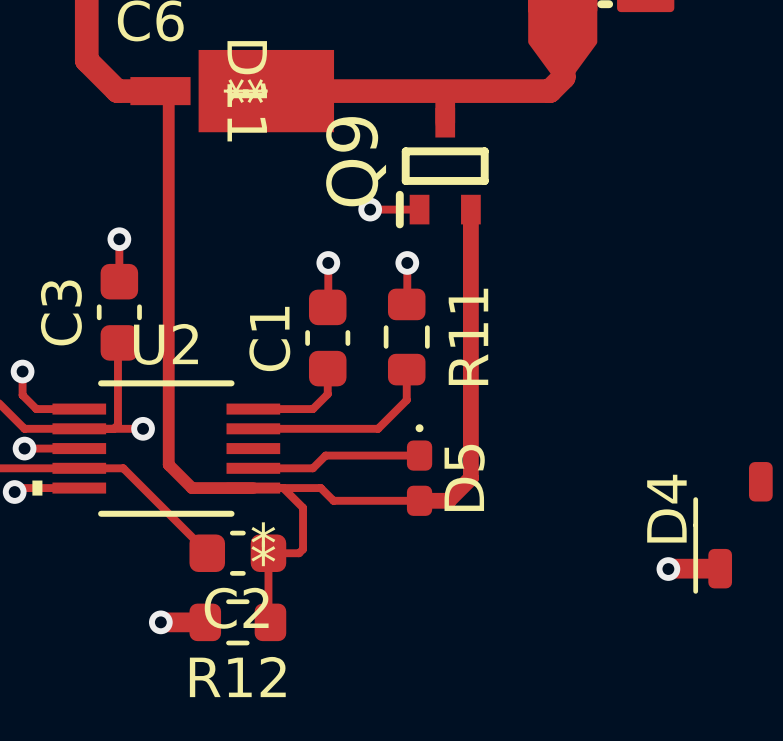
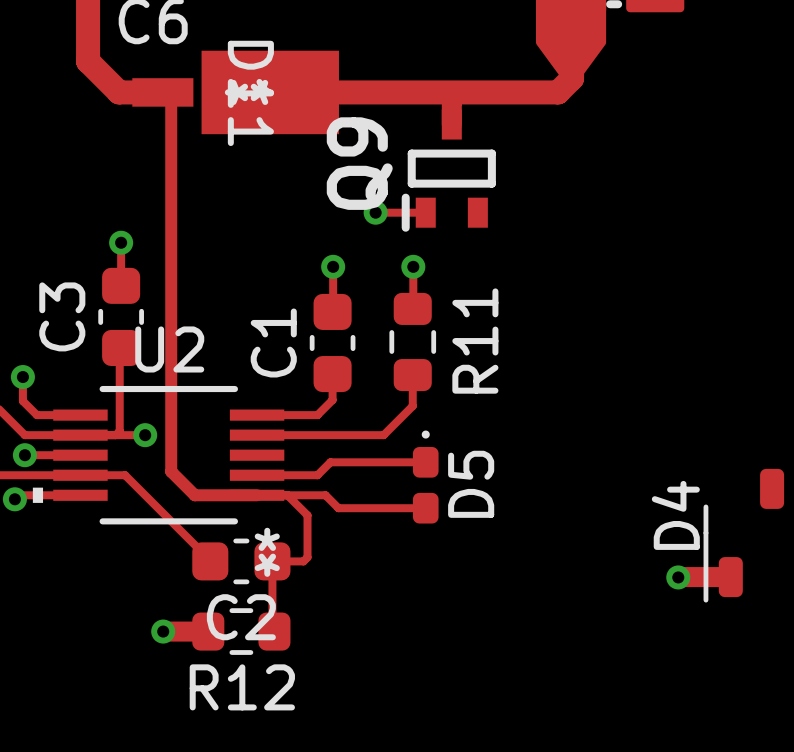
track: (470, 209) (470, 478) (448, 500) (419, 500) -> none

